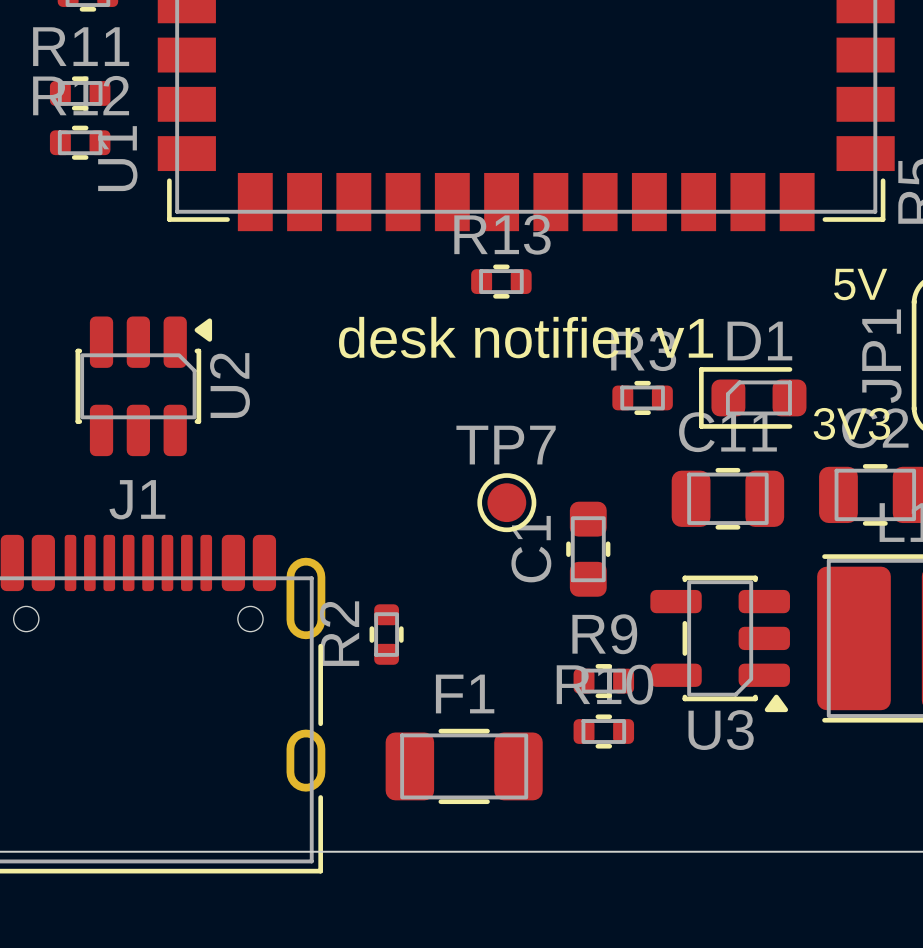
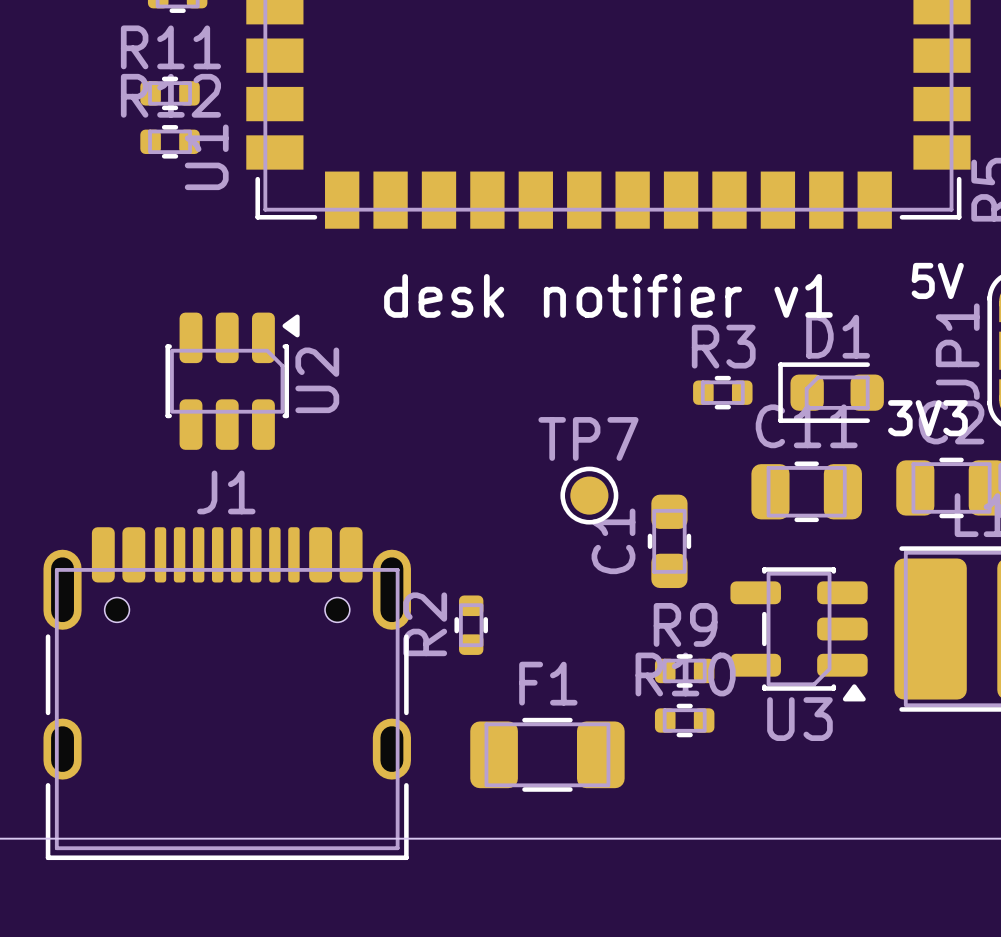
R13: (501, 281) -> none
text position: desk notifier v1 (526, 337) -> desk notifier v1 (608, 295)

